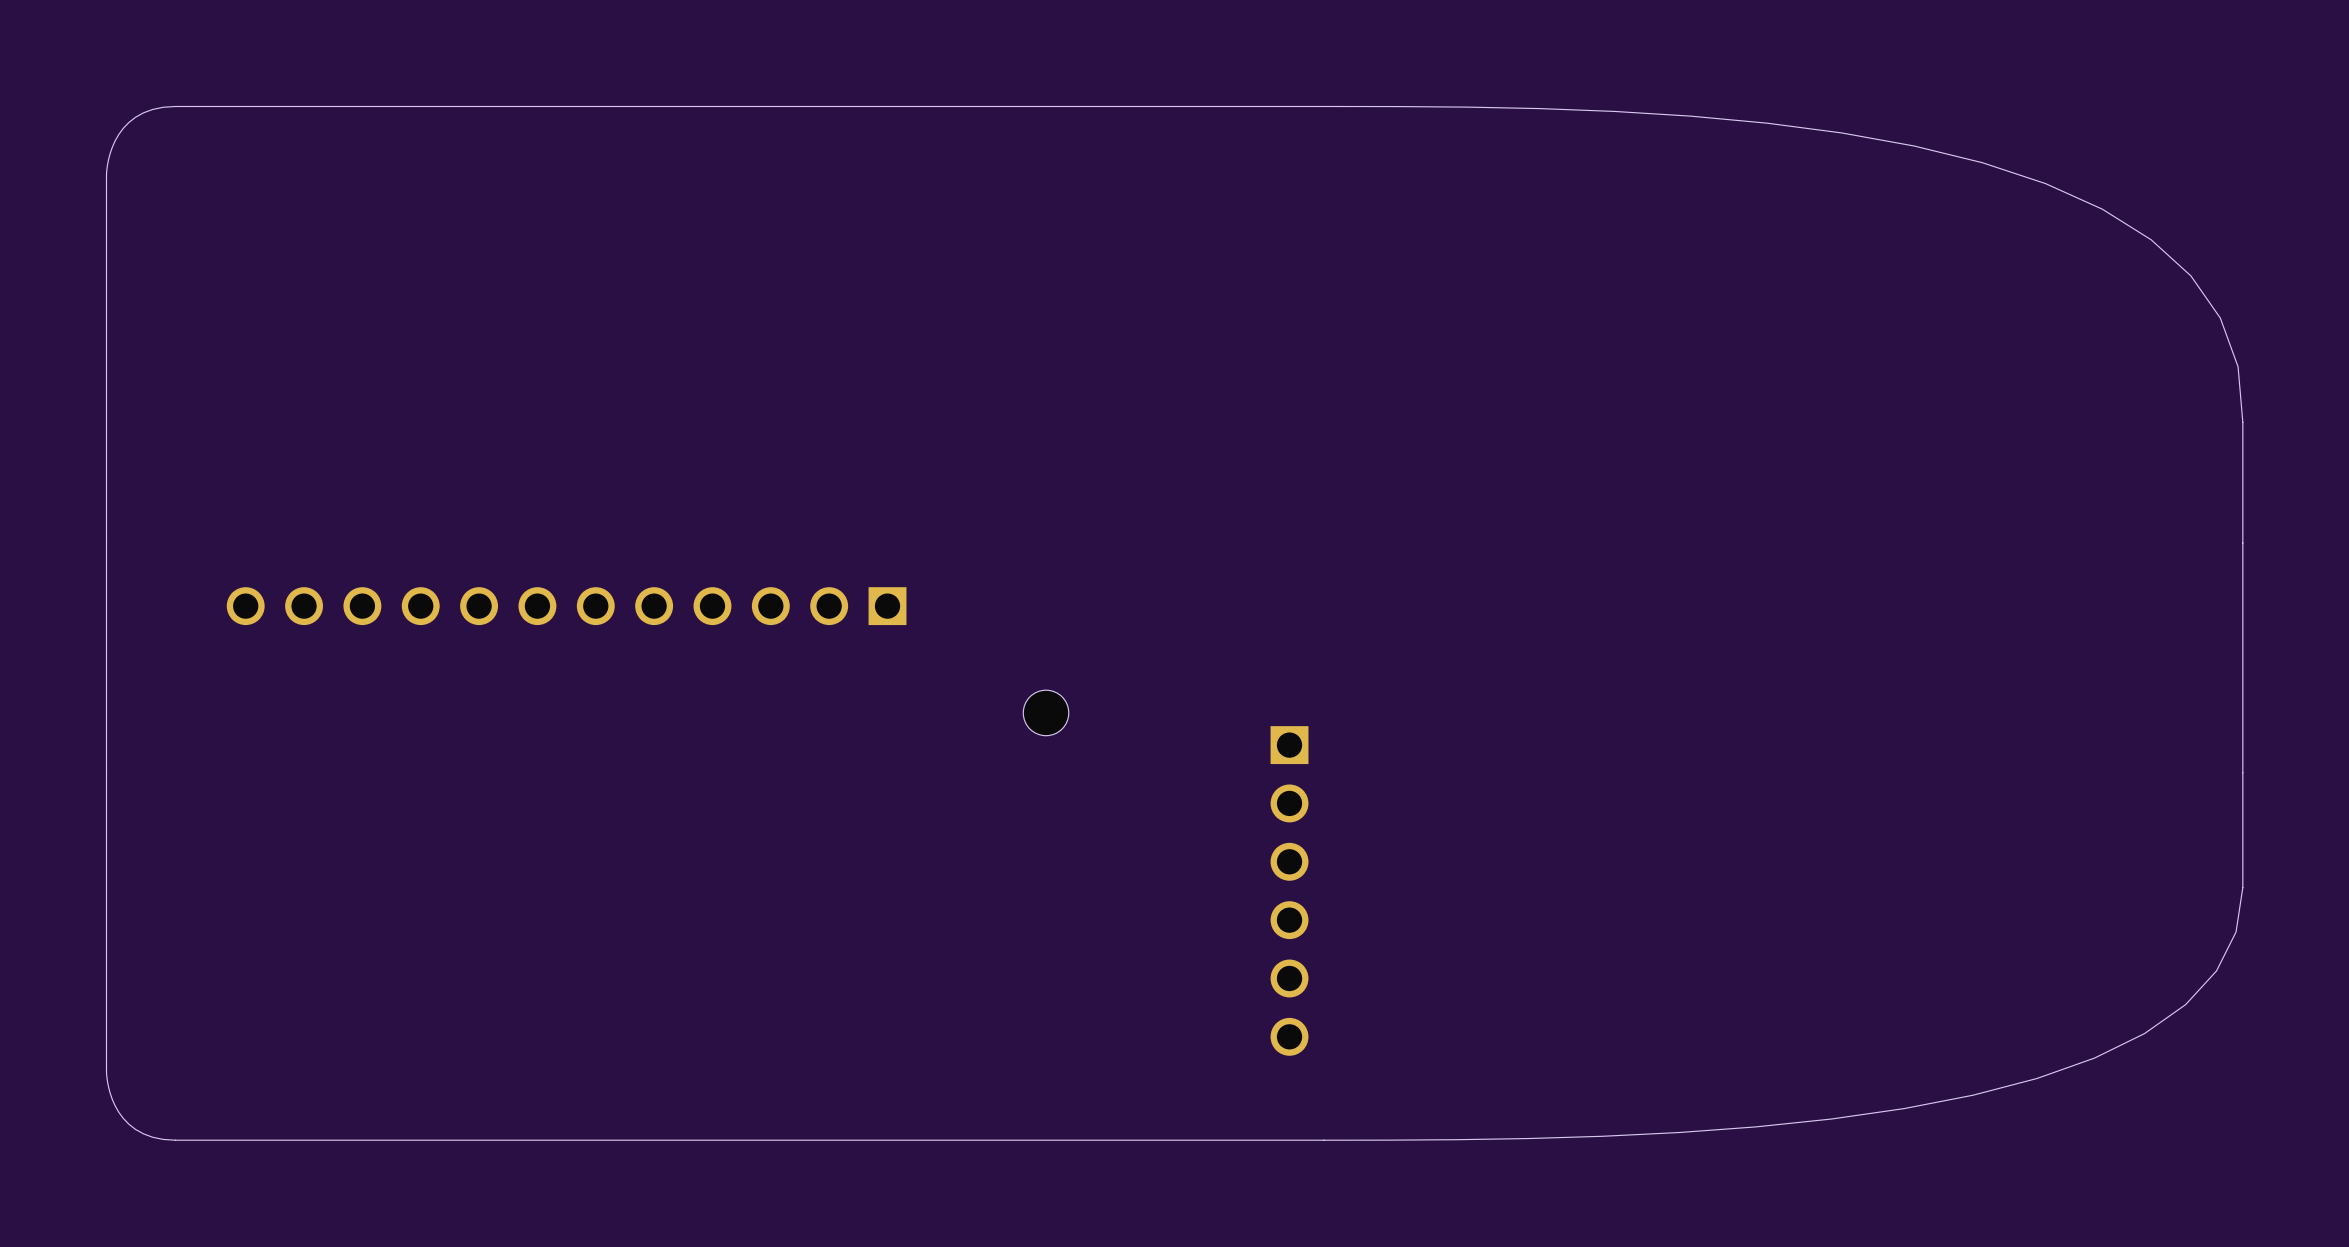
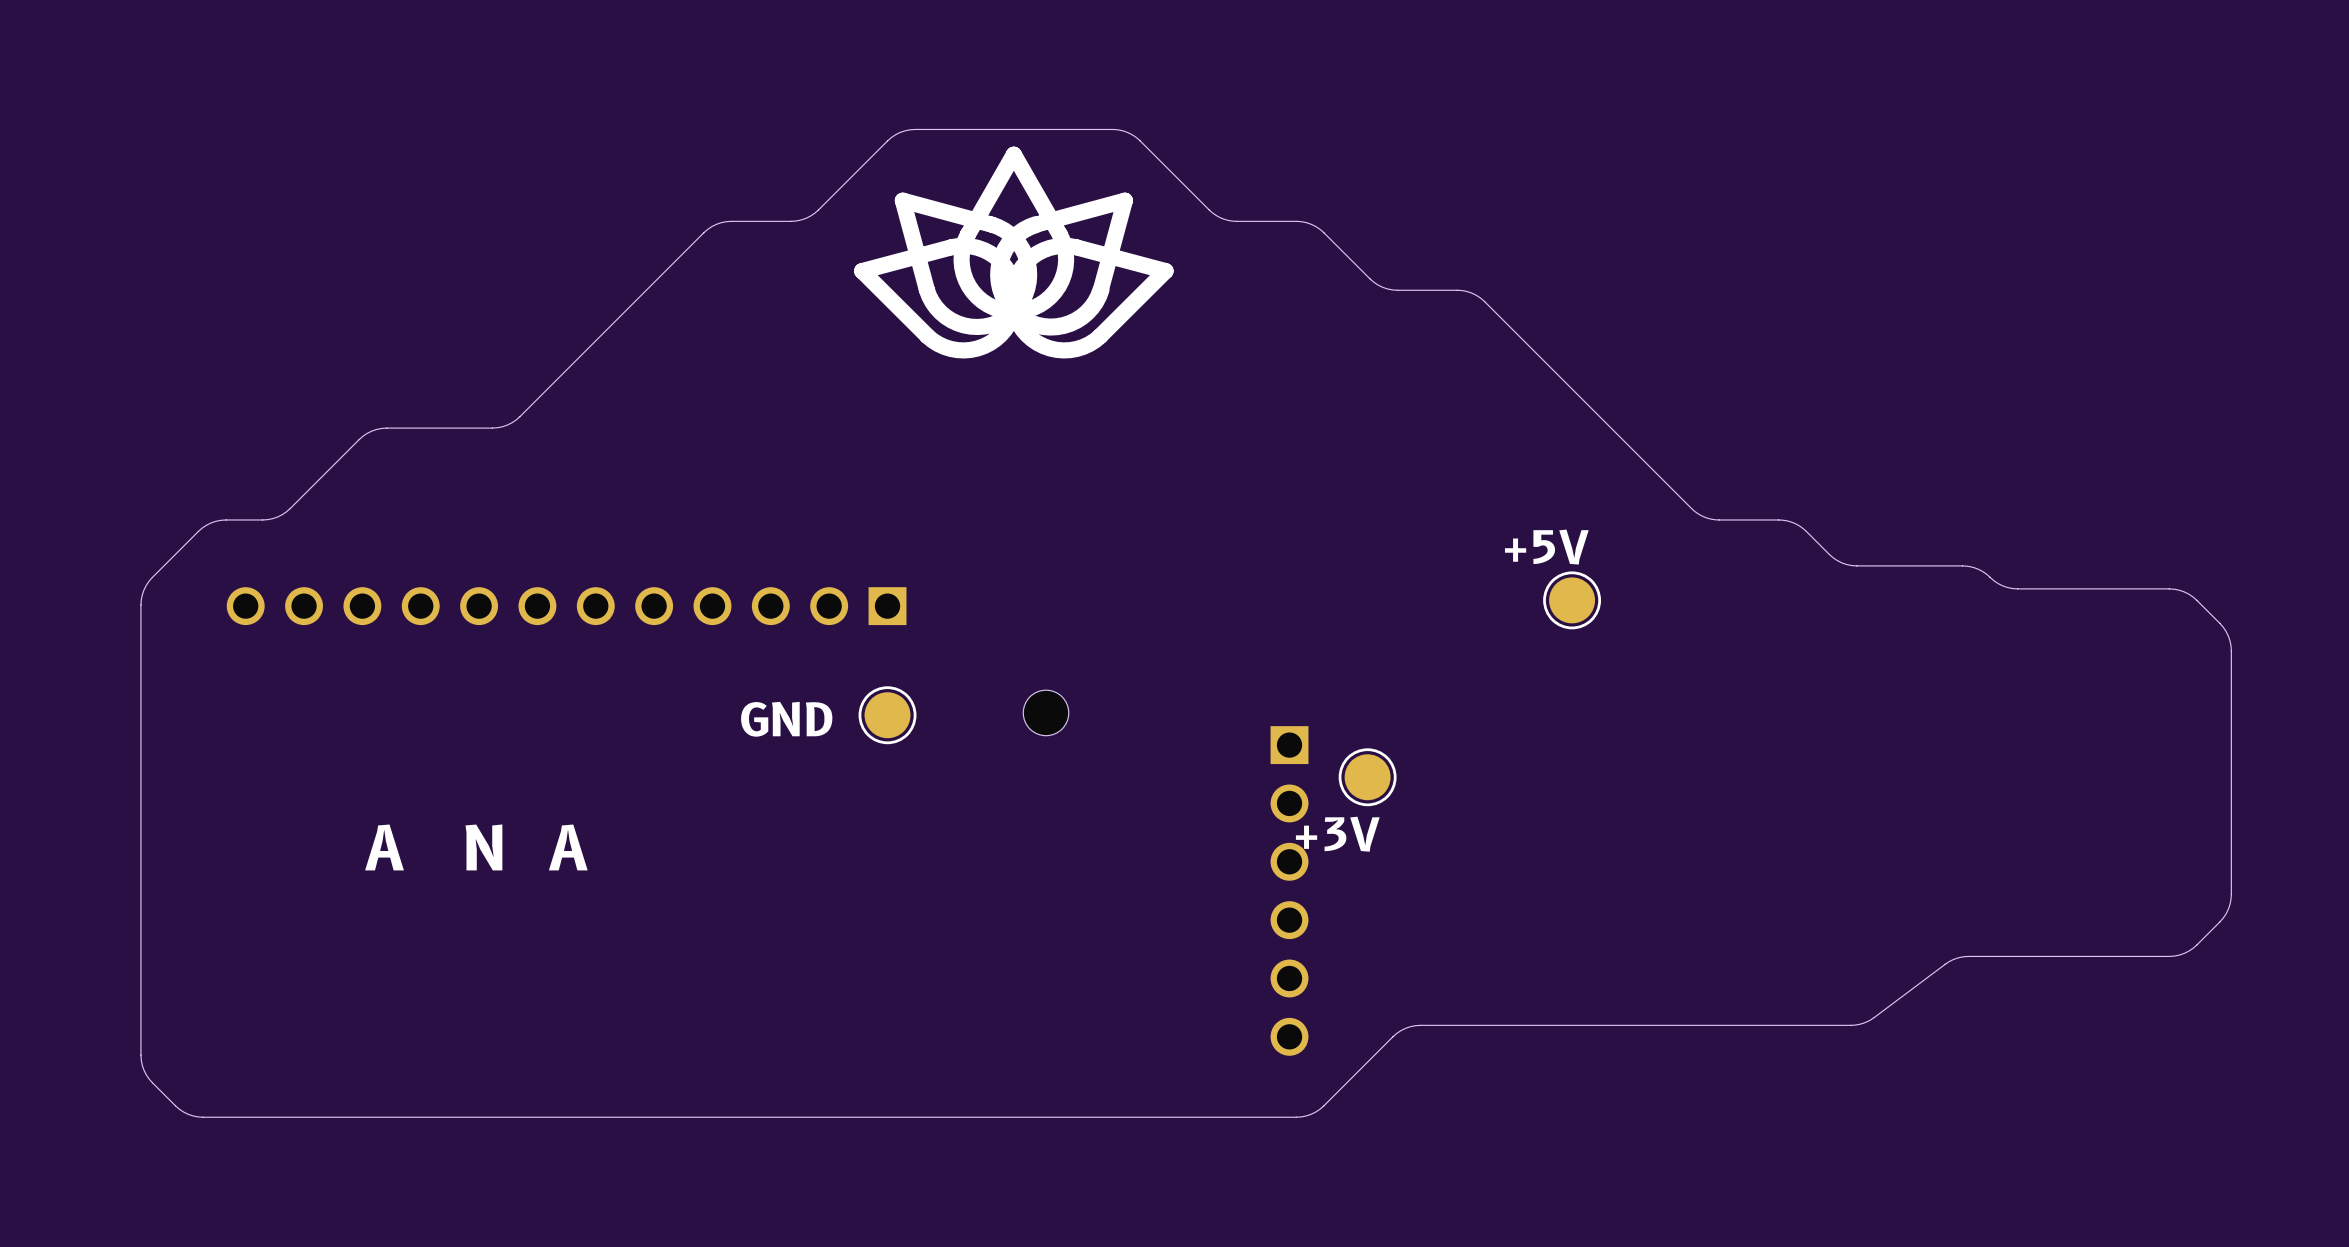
board edge: (1335, 106) (175, 106) (152, 109) (128, 122) (118, 134) (112, 147) (106, 175) (106, 1071) (112, 1099) (123, 1118) (143, 1133) (163, 1139) (175, 1140) (1387, 1140) (1528, 1138) (1679, 1132) (1831, 1119) (1904, 1108) (1972, 1095) (2036, 1078) (2094, 1058) (2144, 1033) (2185, 1004) (2216, 970) (2236, 932) (2242, 887) (2242, 422) (2238, 366) (2220, 318) (2190, 275) (2151, 239) (2102, 209) (2045, 183) (1982, 162) (1914, 145) (1841, 132) (1690, 116) (1539, 108) (1335, 106) -> (1112, 129) (1123, 131) (1137, 138) (1209, 209) (1221, 218) (1232, 221) (1307, 223) (1321, 230) (1369, 278) (1382, 287) (1397, 290) (1460, 290) (1478, 296) (1691, 508) (1704, 517) (1715, 519) (1790, 521) (1803, 528) (1833, 557) (1851, 565) (1966, 566) (1980, 570) (1998, 583) (2012, 588) (2169, 588) (2179, 590) (2193, 596) (2223, 627) (2231, 645) (2231, 894) (2228, 909) (2223, 918) (2193, 948) (2174, 956) (1968, 956) (1956, 958) (1945, 964) (1870, 1019) (1854, 1025) (1410, 1026) (1392, 1036) (1320, 1109) (1301, 1116) (203, 1117) (188, 1114) (175, 1105) (149, 1078) (142, 1065) (140, 1055) (140, 605) (143, 590) (152, 577) (198, 531) (211, 522) (226, 519) (267, 519) (282, 514) (359, 439) (371, 431) (386, 428) (492, 428) (511, 422) (707, 229) (726, 221) (796, 221) (810, 216) (887, 140) (900, 132) (915, 129) (1112, 129)
line: none -> (1013, 154) (1059, 234) (1064, 247) (1066, 260) (1061, 280) (1050, 296) (1033, 307) (1013, 311) (994, 307) (977, 296) (965, 280) (961, 260) (963, 247) (967, 234) (1013, 154)
line: none -> (951, 247) (862, 271) (932, 340) (950, 348) (964, 350) (977, 348) (995, 339) (1008, 324) (1015, 305) (1013, 284) (1005, 266) (990, 253) (971, 246) (951, 247)
line: none -> (1076, 247) (1165, 271) (1095, 340) (1083, 346) (1070, 350) (1050, 348) (1032, 339) (1018, 324) (1012, 305) (1013, 284) (1022, 266) (1037, 253) (1056, 246) (1076, 247)
line: none -> (926, 289) (902, 200) (998, 226) (1009, 233) (1019, 243) (1027, 261) (1028, 282) (1022, 301) (1008, 316) (990, 325) (970, 326) (951, 320) (936, 307) (926, 289)
line: none -> (1100, 289) (1124, 200) (1029, 227) (1013, 238) (1005, 249) (1000, 261) (999, 282) (1005, 301) (1019, 316) (1037, 325) (1057, 326) (1076, 320) (1091, 307) (1101, 289)
text: none -> +5V (1546, 547)
part: none -> (1572, 600)
part: none -> (887, 715)
text: none -> GND (786, 719)
part: none -> (1367, 777)
text: none -> +3V (1337, 834)
text: none -> A (384, 847)
text: none -> N (483, 847)
text: none -> A (568, 847)

